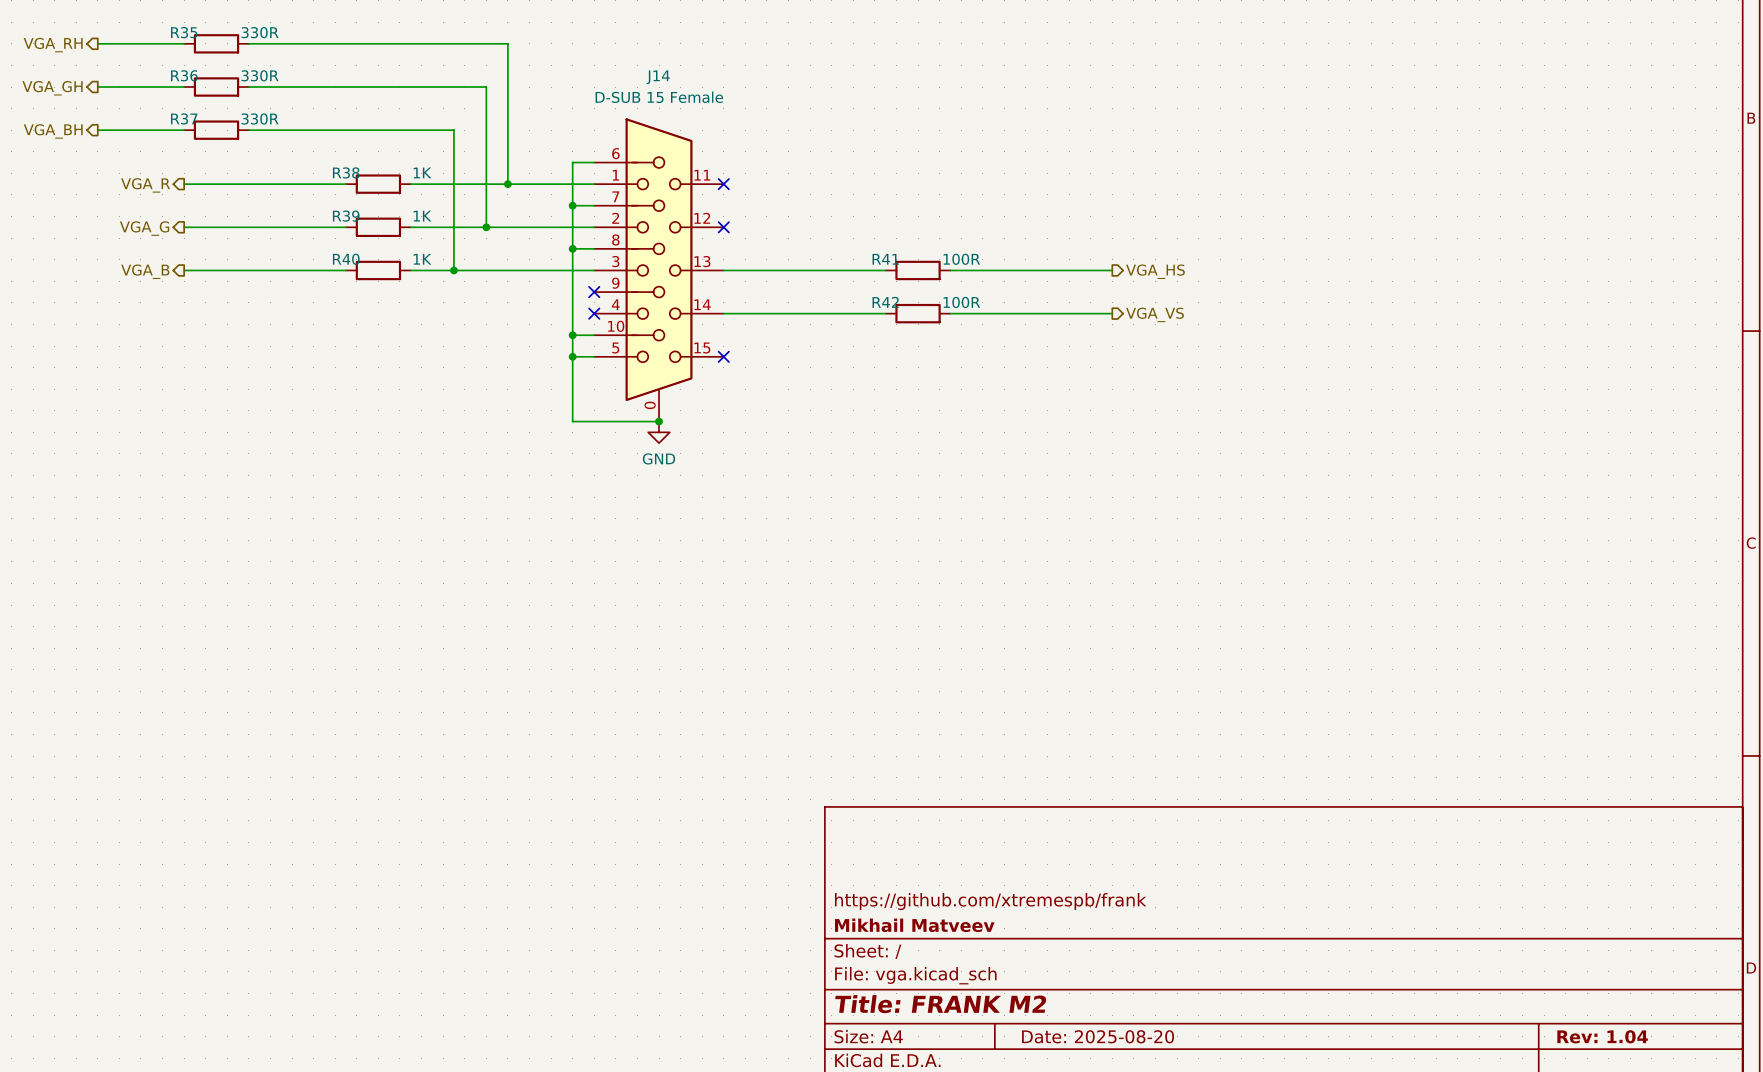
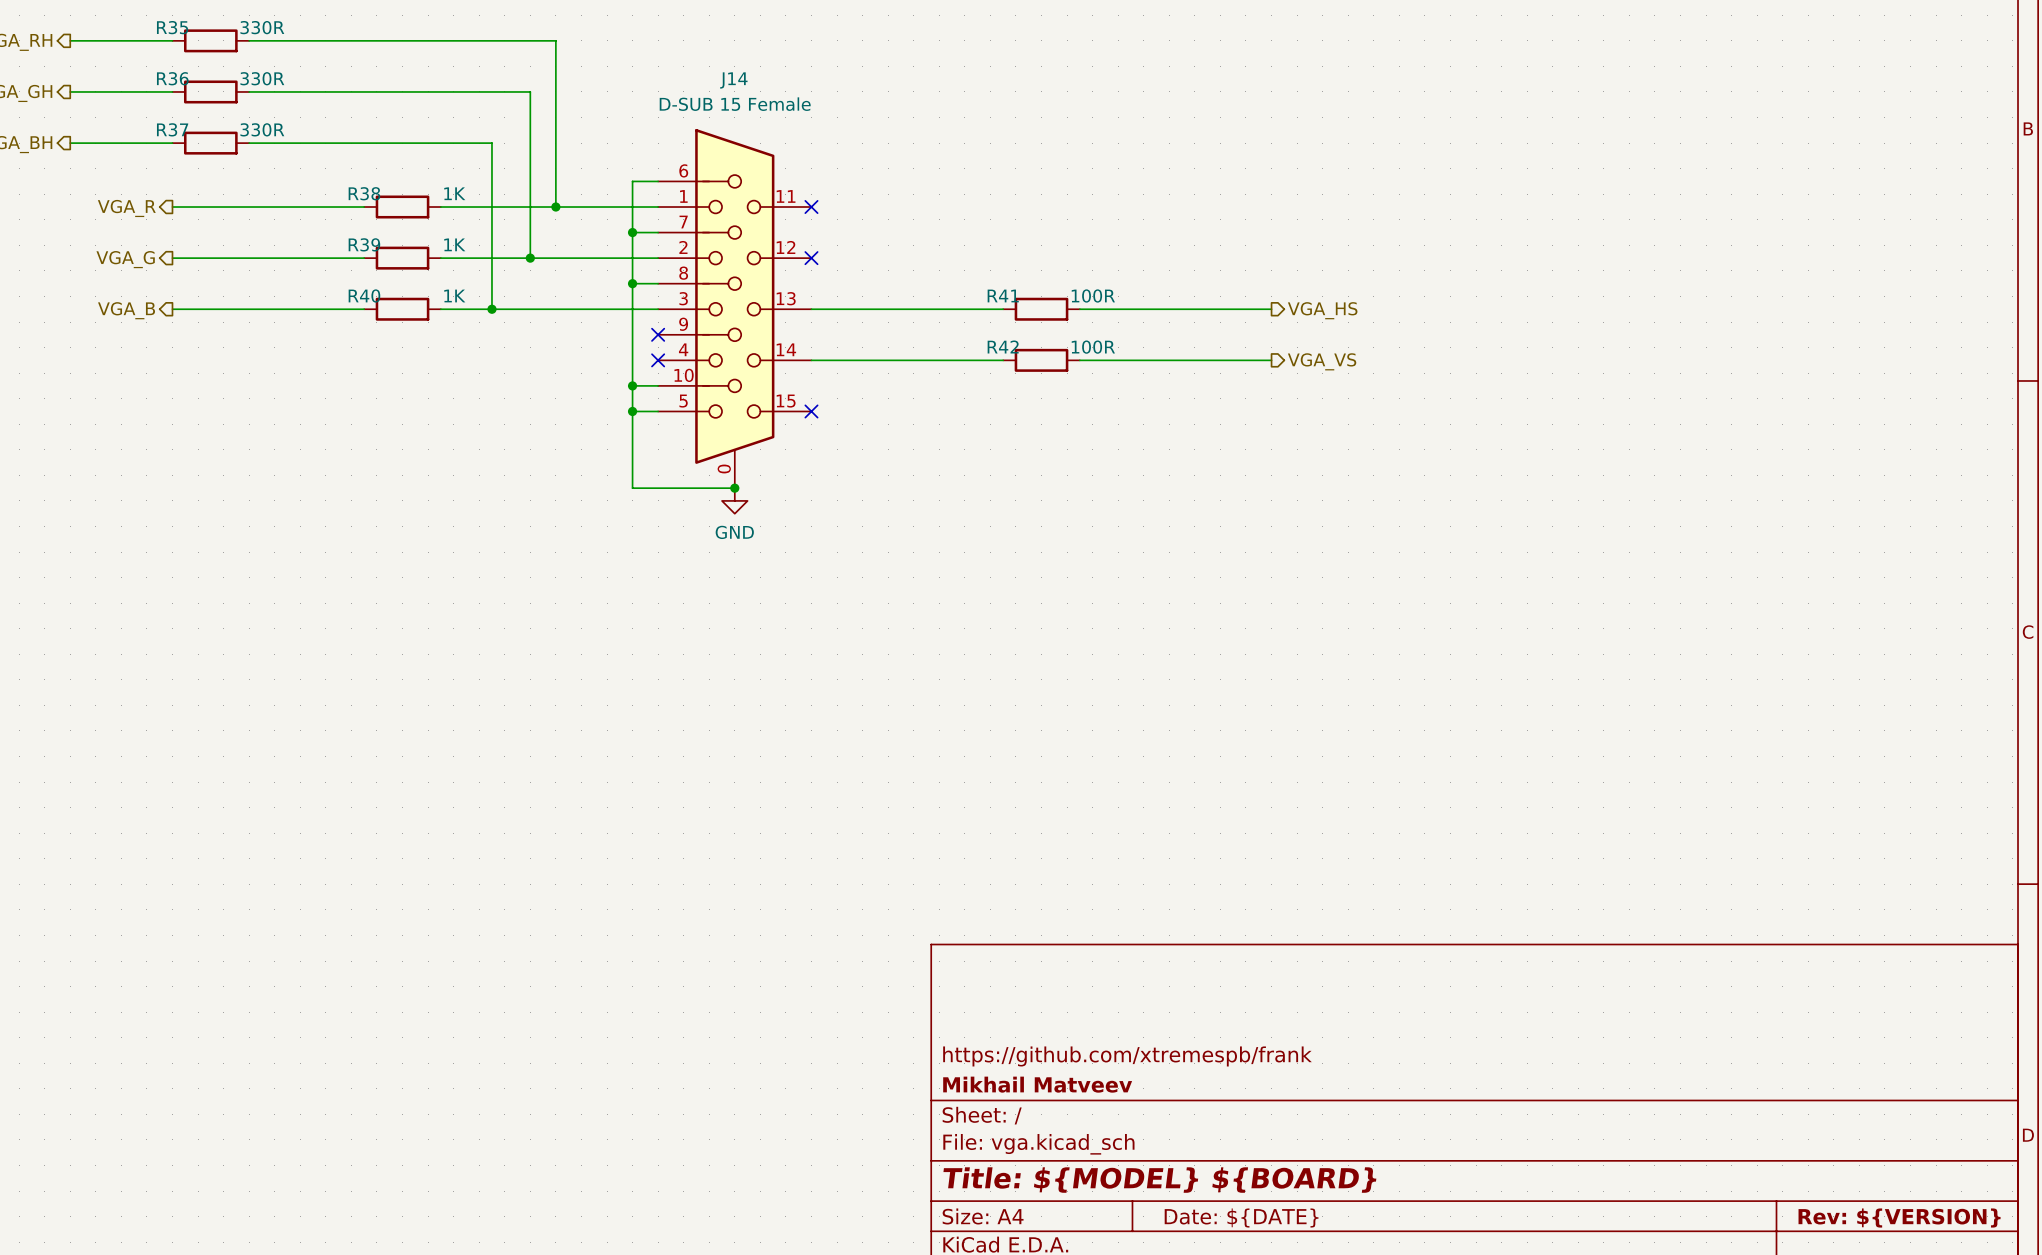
title block: Title: FRANK M2 (940, 1004) -> Title: ${MODEL} ${BOARD} (1159, 1180)
title block: Date: 2025-08-20 (1098, 1036) -> Date: ${DATE} (1241, 1218)
title block: Rev: 1.04 (1602, 1036) -> Rev: ${VERSION} (1899, 1218)

